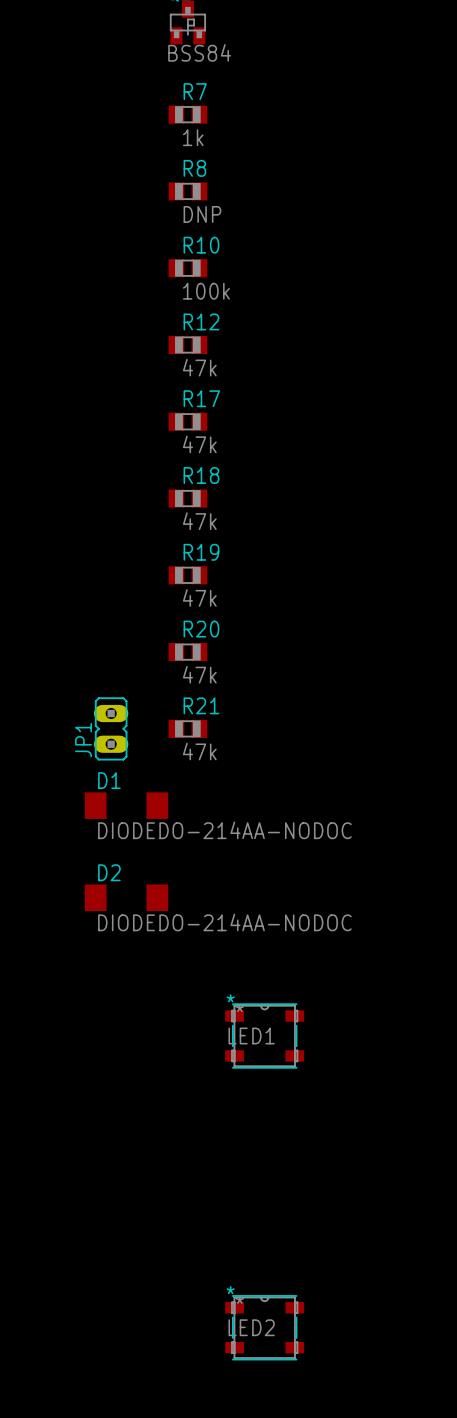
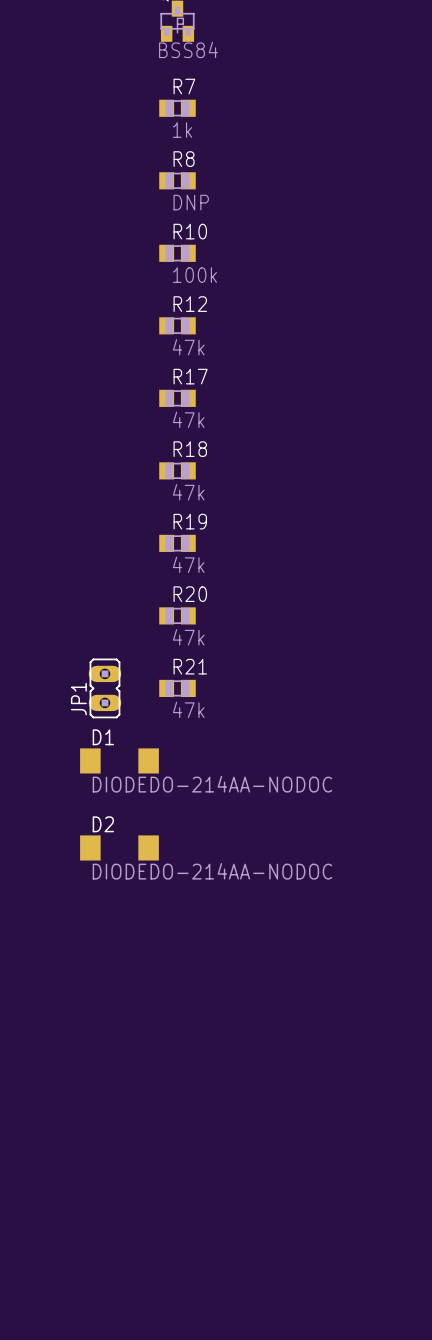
LED1: (264, 1035) -> none
LED2: (264, 1327) -> none

